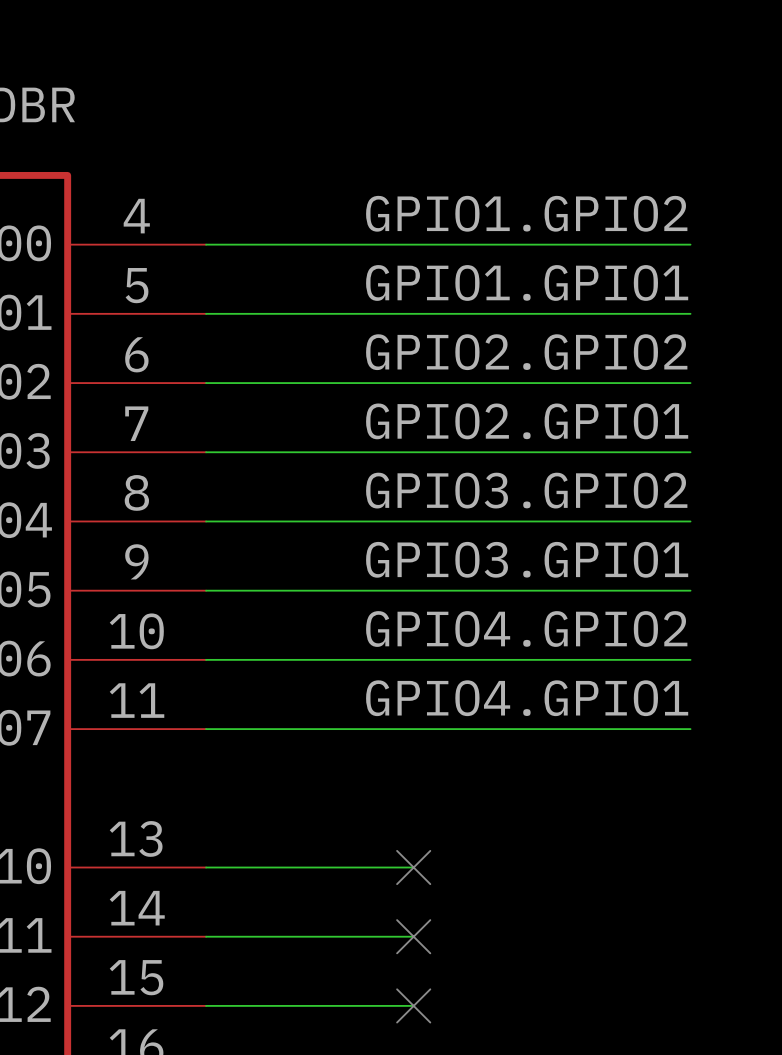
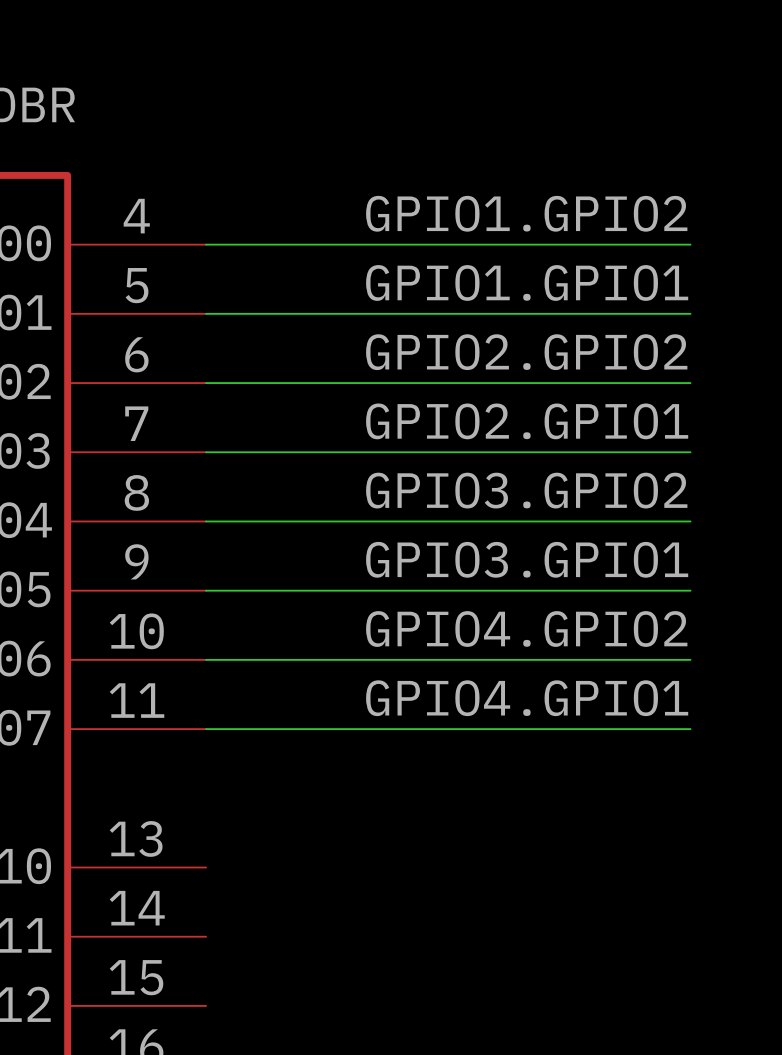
wire: (206, 867) (413, 867) -> none
no-connect mark: (413, 867) -> none
wire: (206, 936) (413, 936) -> none
no-connect mark: (413, 936) -> none
wire: (206, 1005) (413, 1005) -> none
no-connect mark: (413, 1005) -> none

